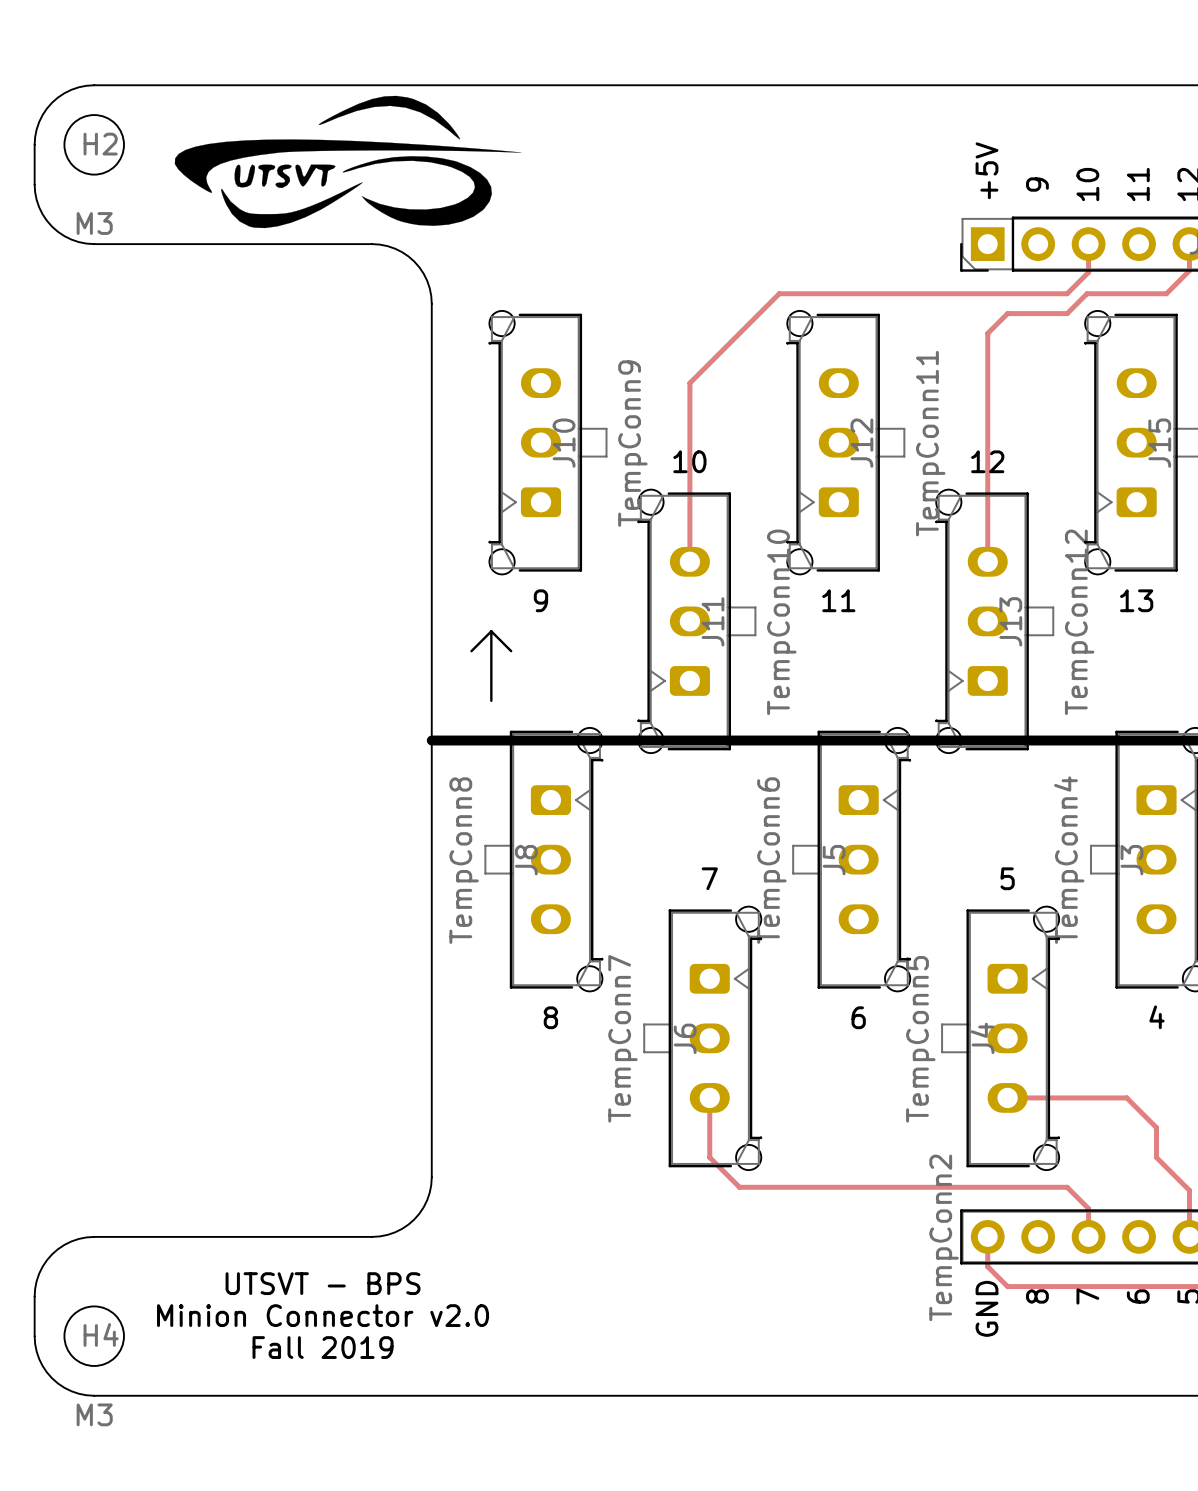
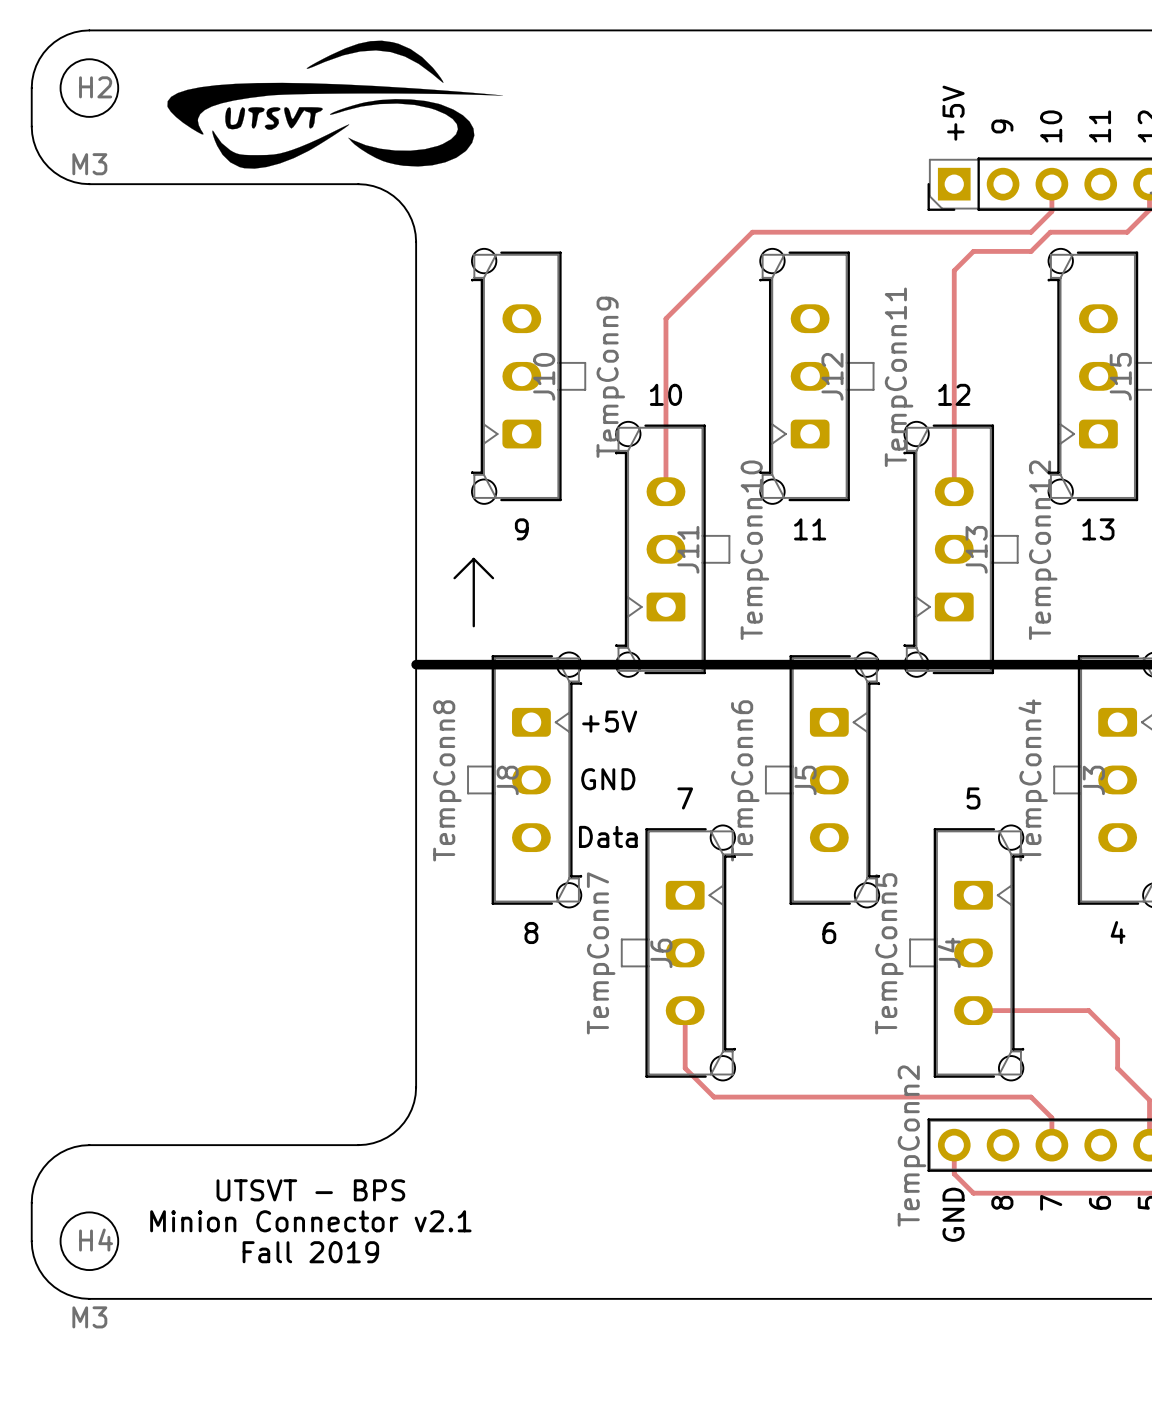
text: none -> +5V (609, 721)
text: none -> GND (608, 779)
text: none -> Data (608, 836)
text: Minion Connector v2.0 (323, 1315) -> Minion Connector v2.1 (310, 1221)

